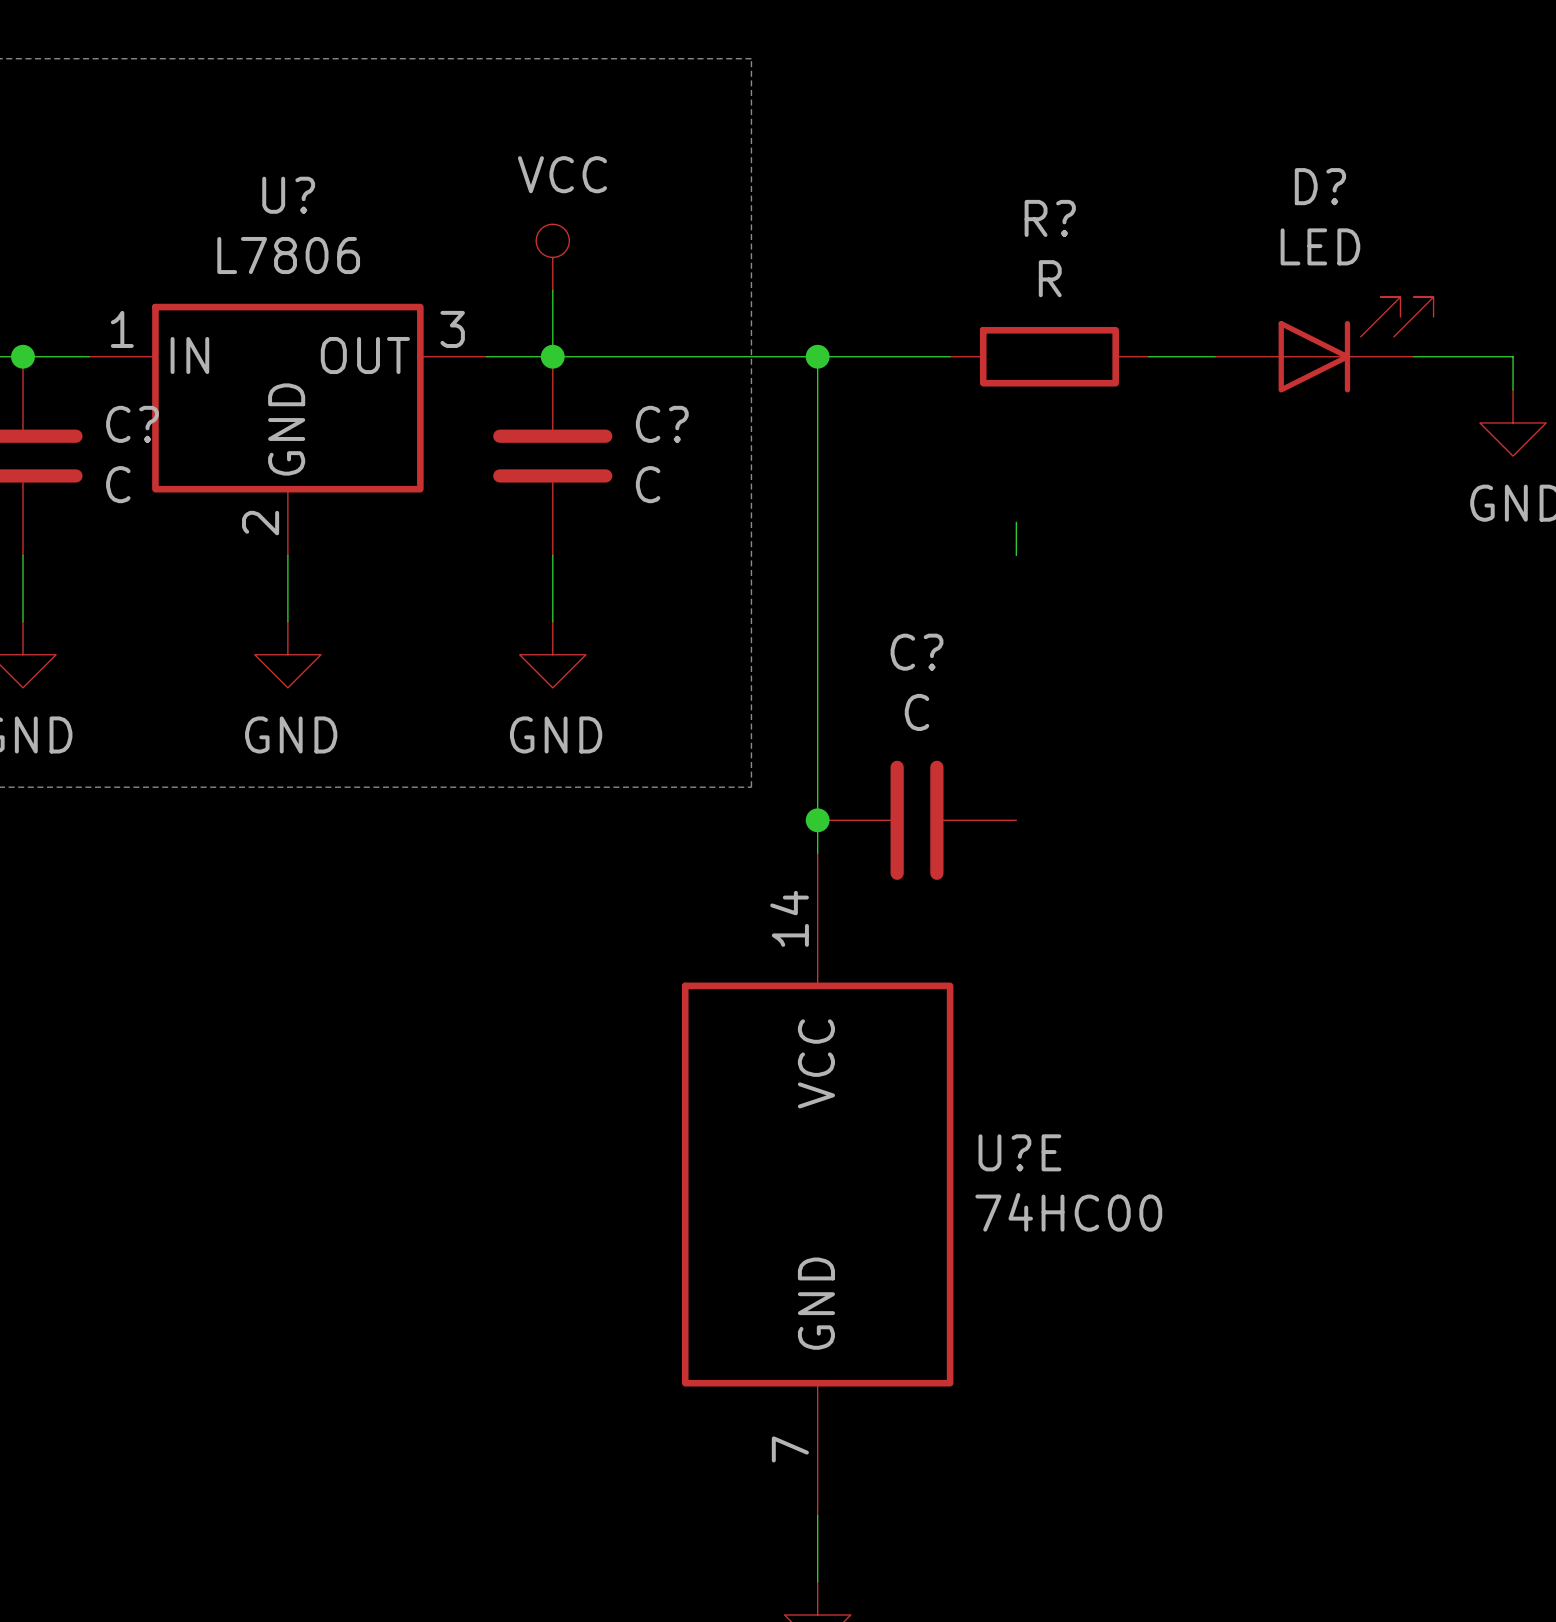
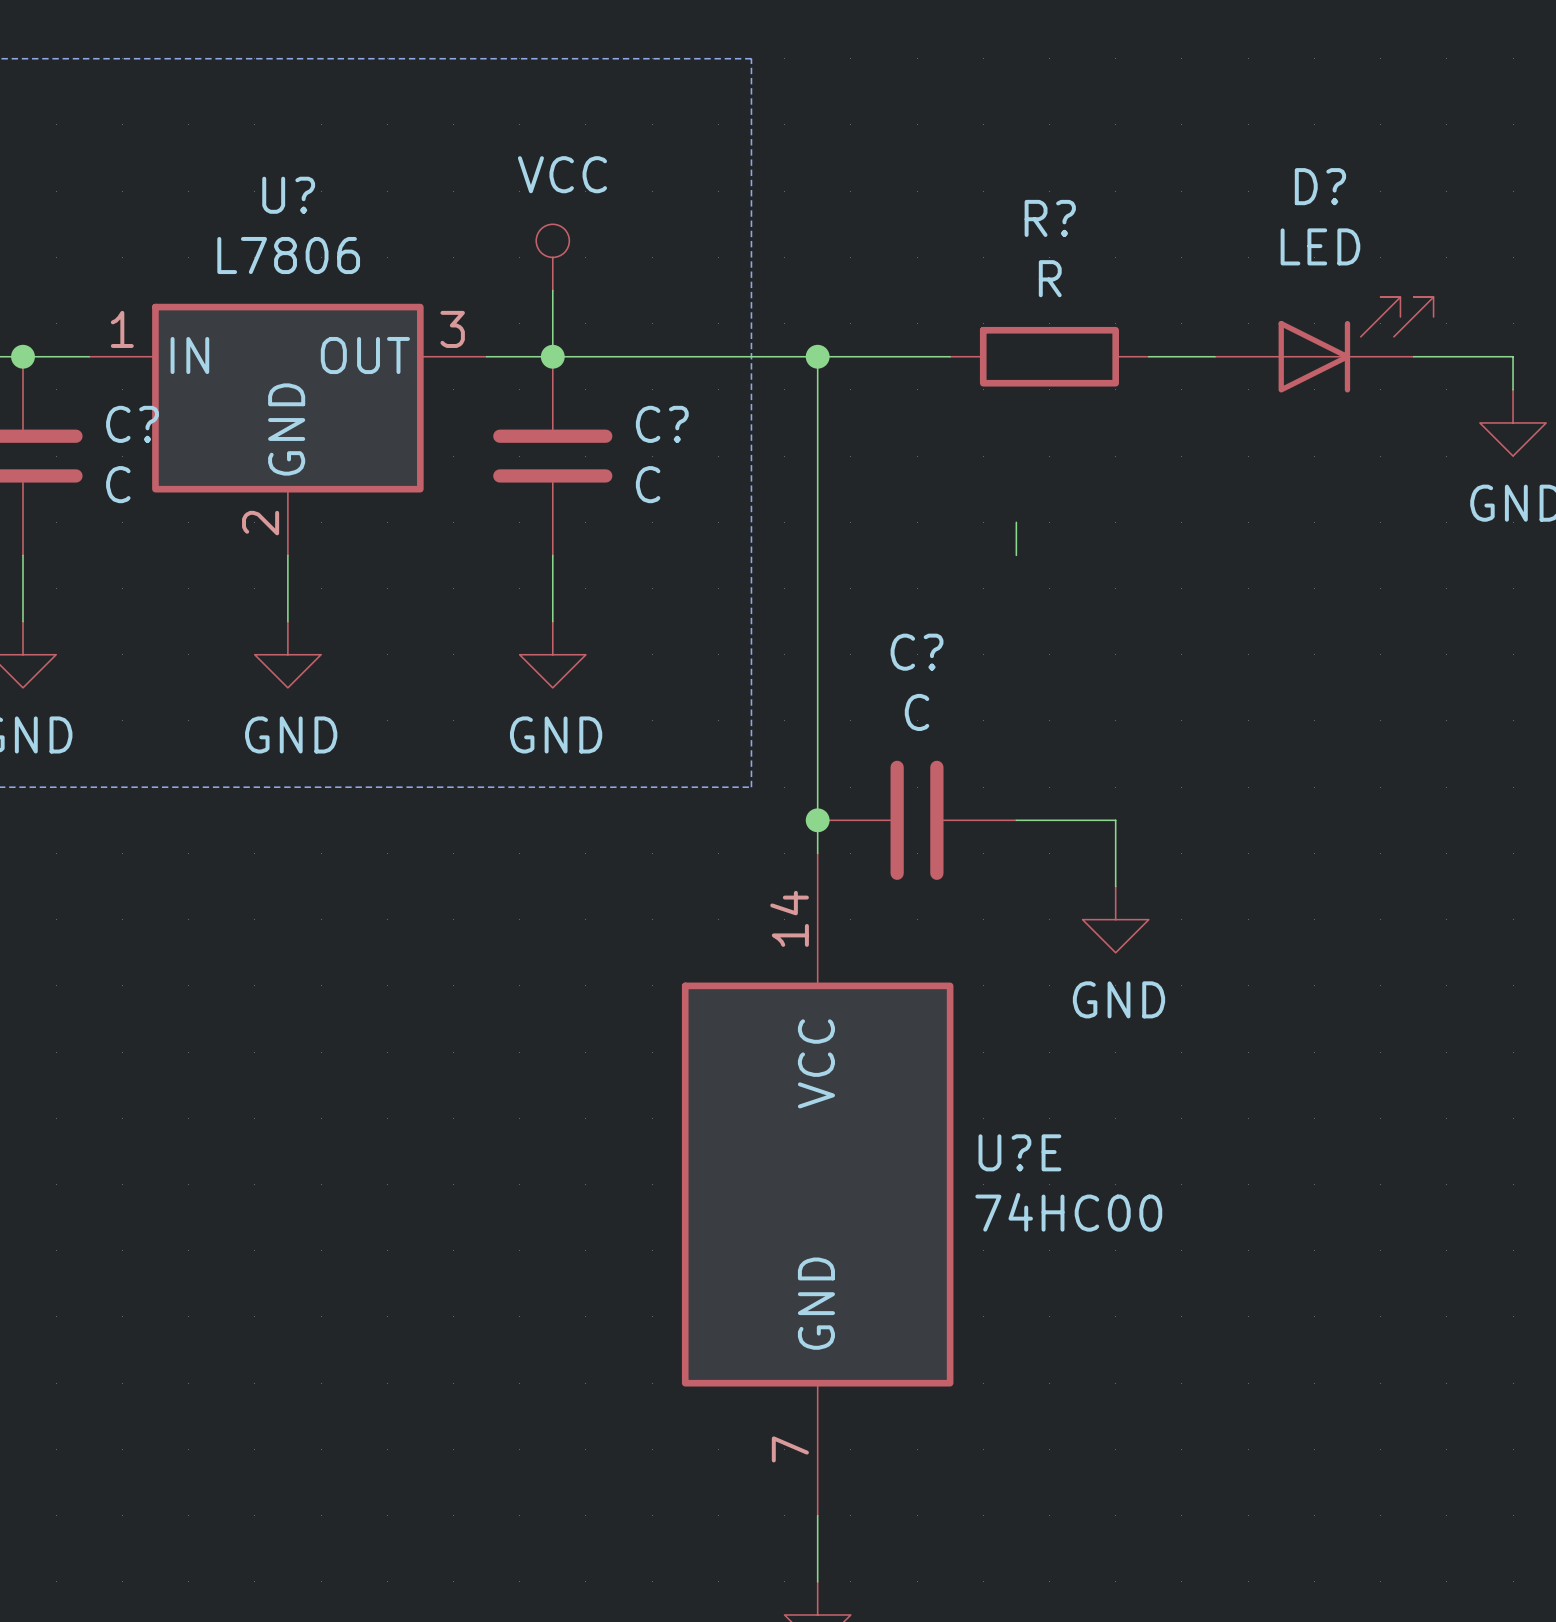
wire: none -> (1016, 820) (1115, 820) (1115, 886)
power symbol: none -> GND (1115, 919)

